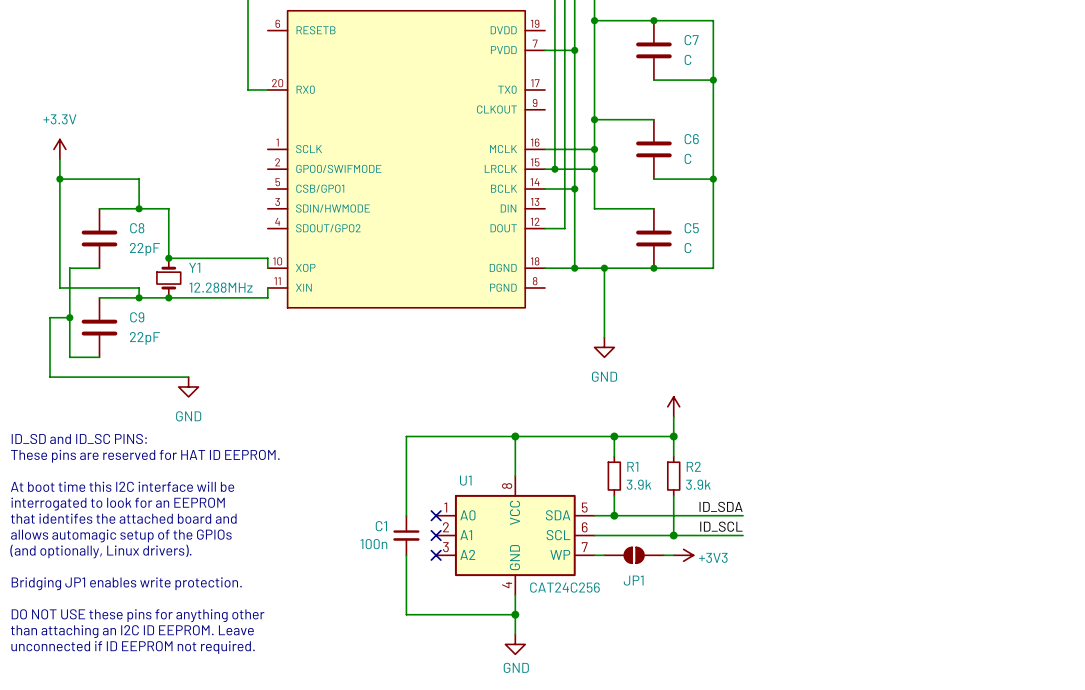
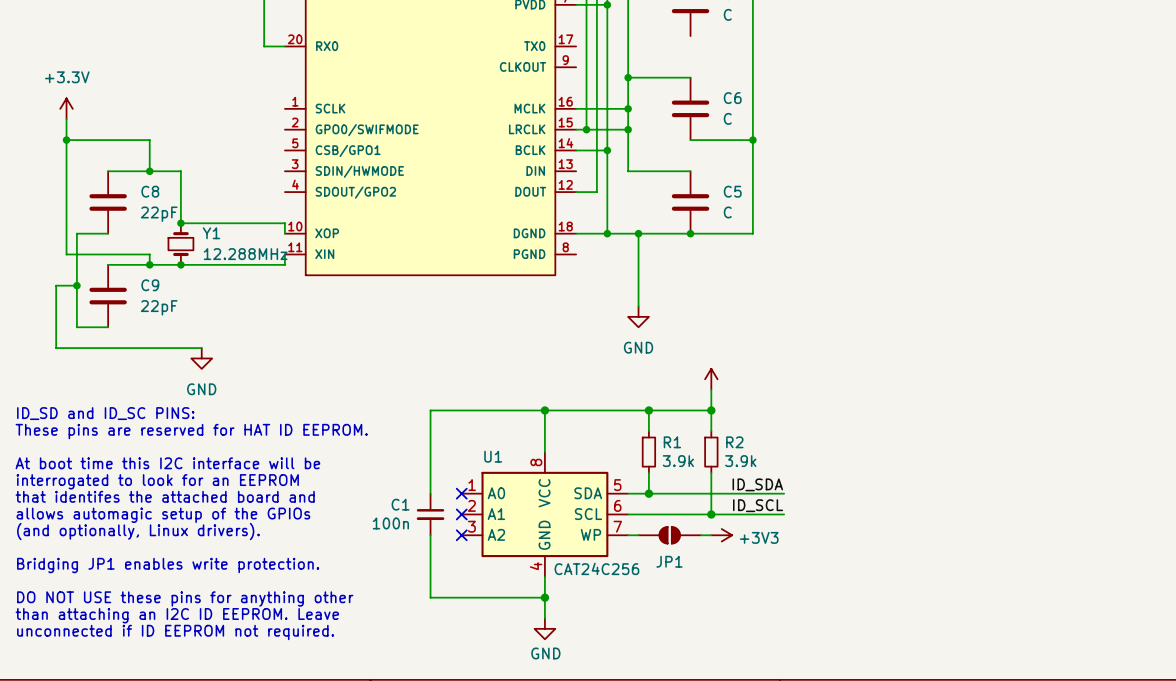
wire: (653, 80) (713, 80) -> none
junction: (713, 80) -> none

